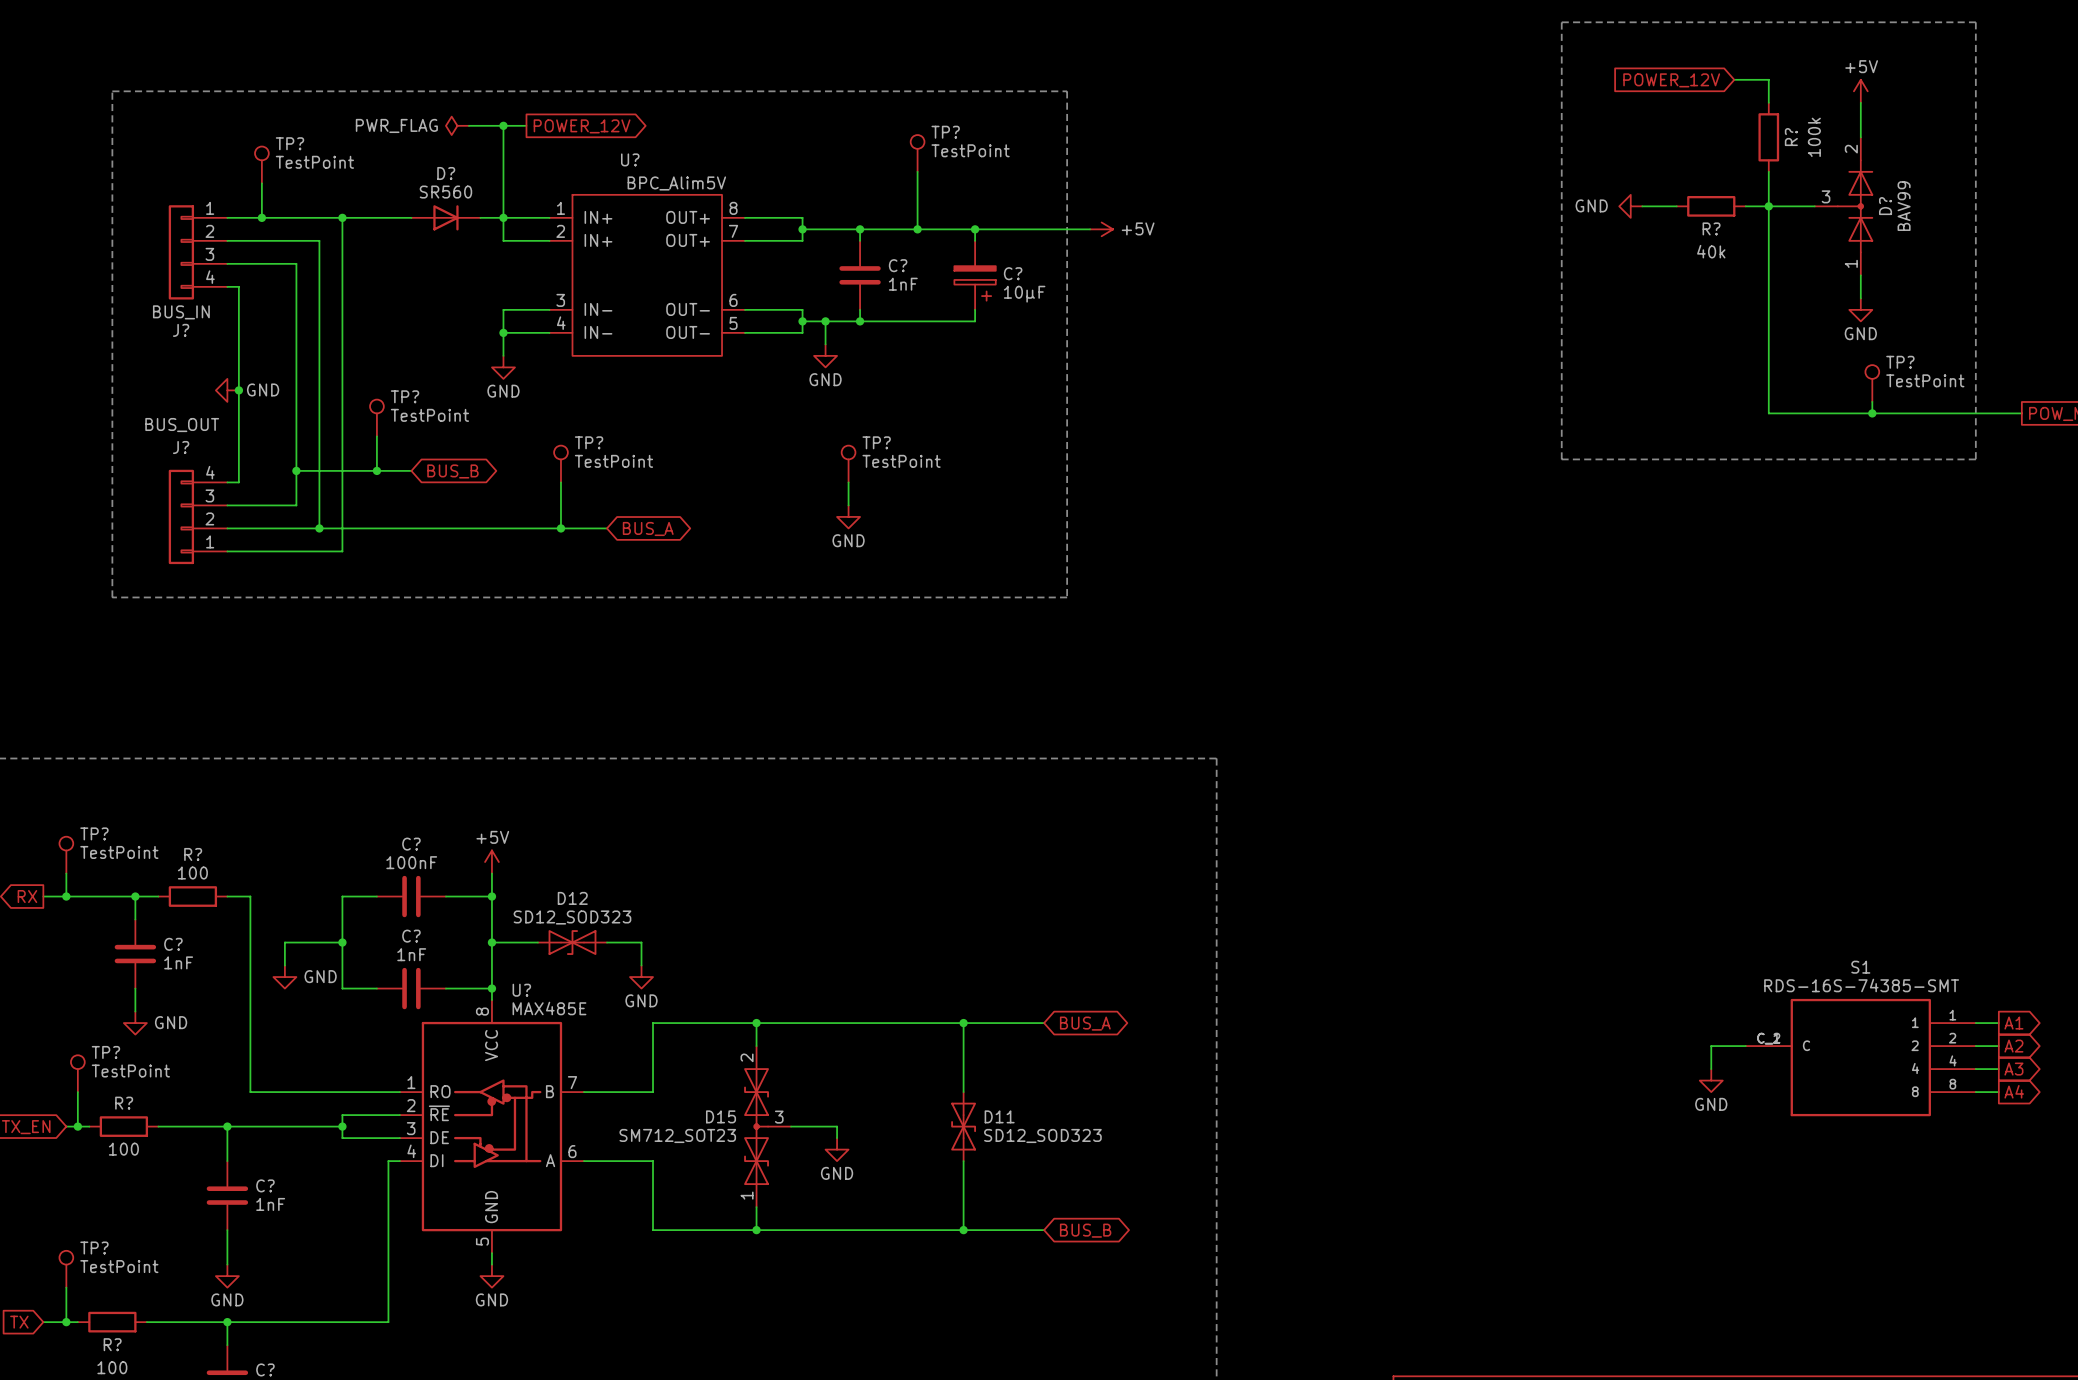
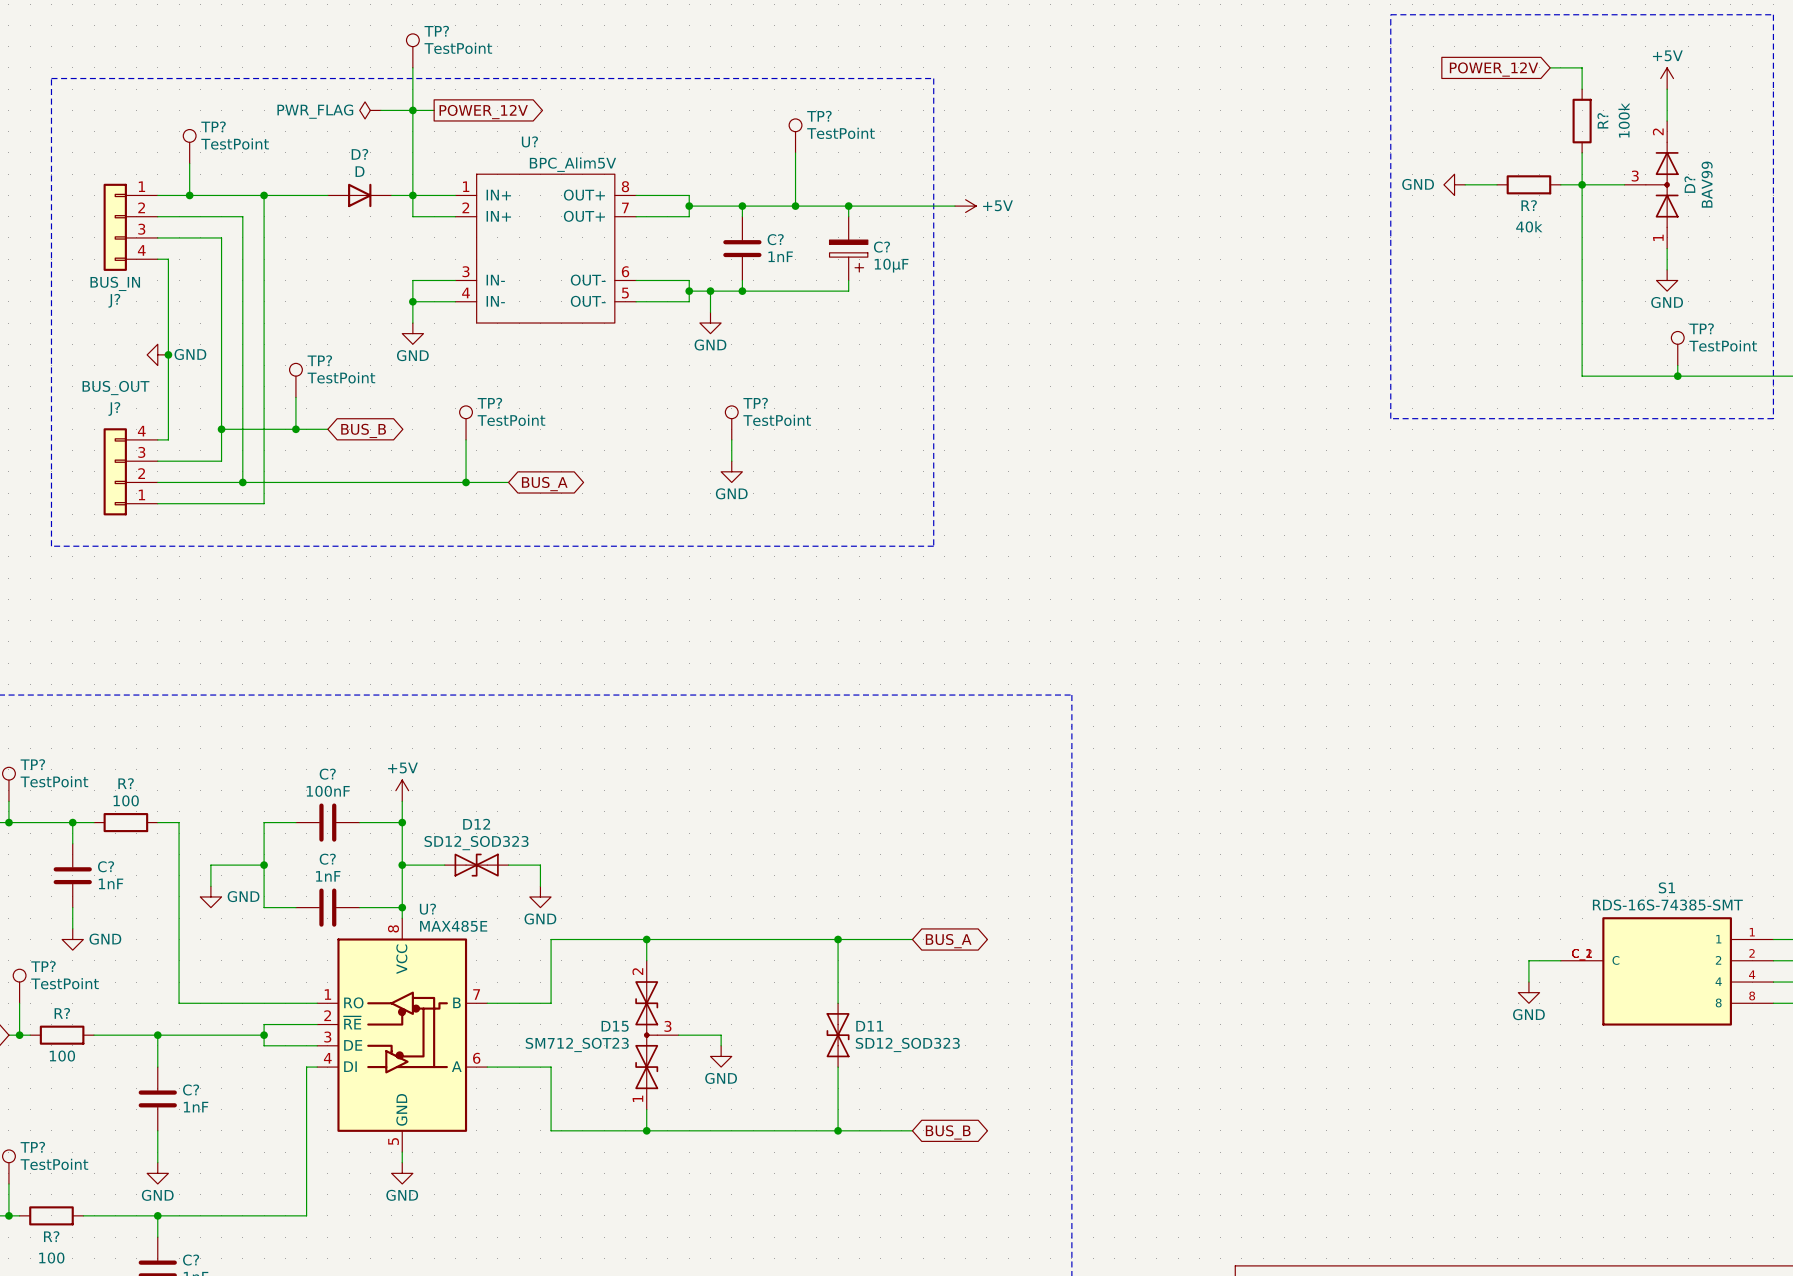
TP?: none -> TestPoint (412, 50)
wire: none -> (412, 67) (412, 110)
D? value: SR560 (445, 192) -> D (360, 171)

